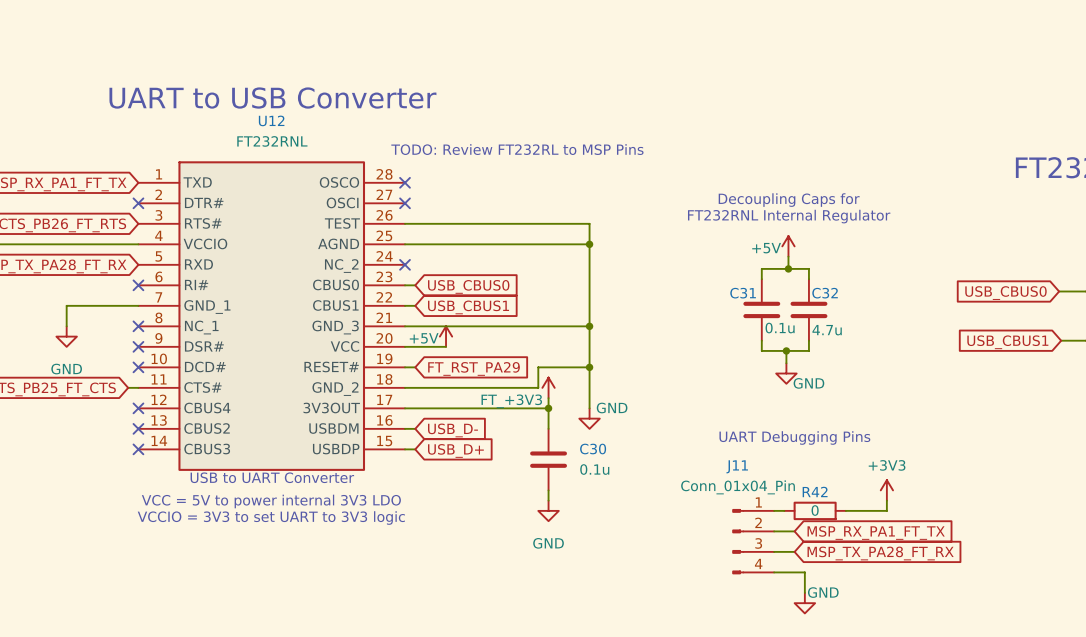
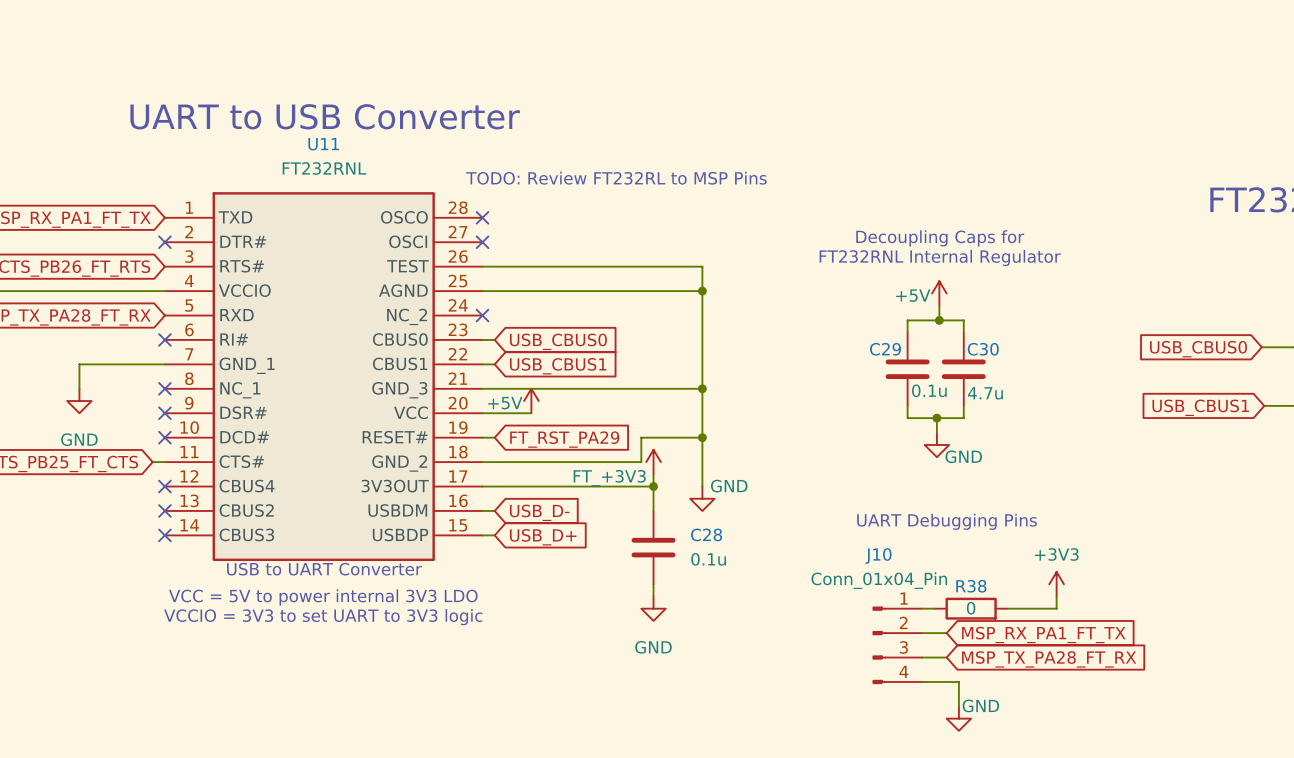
U12 name: U12 (271, 120) -> U11 (323, 144)
C31 name: C31 (743, 293) -> C29 (885, 349)
C32 name: C32 (825, 293) -> C30 (983, 349)
C30 name: C30 (593, 449) -> C28 (706, 534)
J11 name: J11 (737, 466) -> J10 (878, 556)
R42 name: R42 (815, 491) -> R38 (971, 586)

